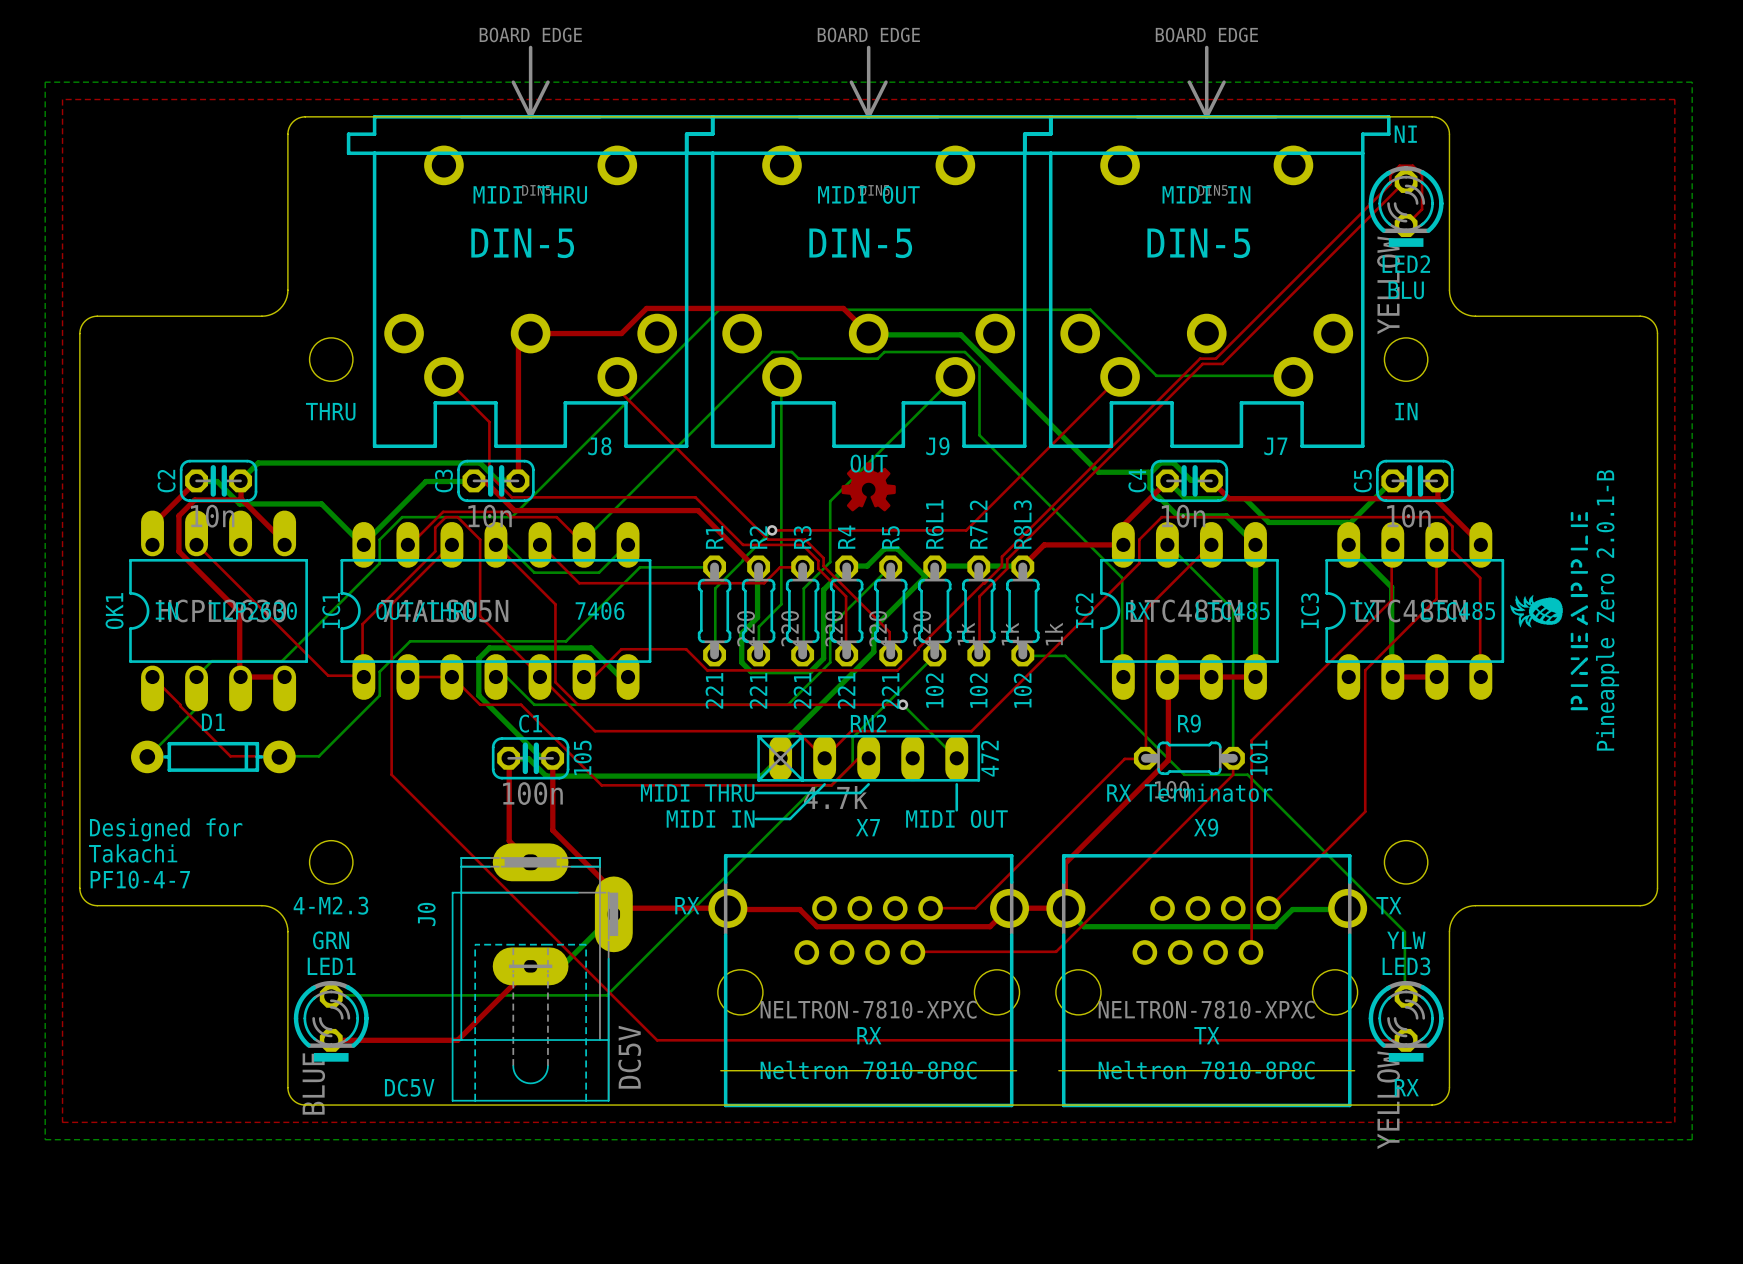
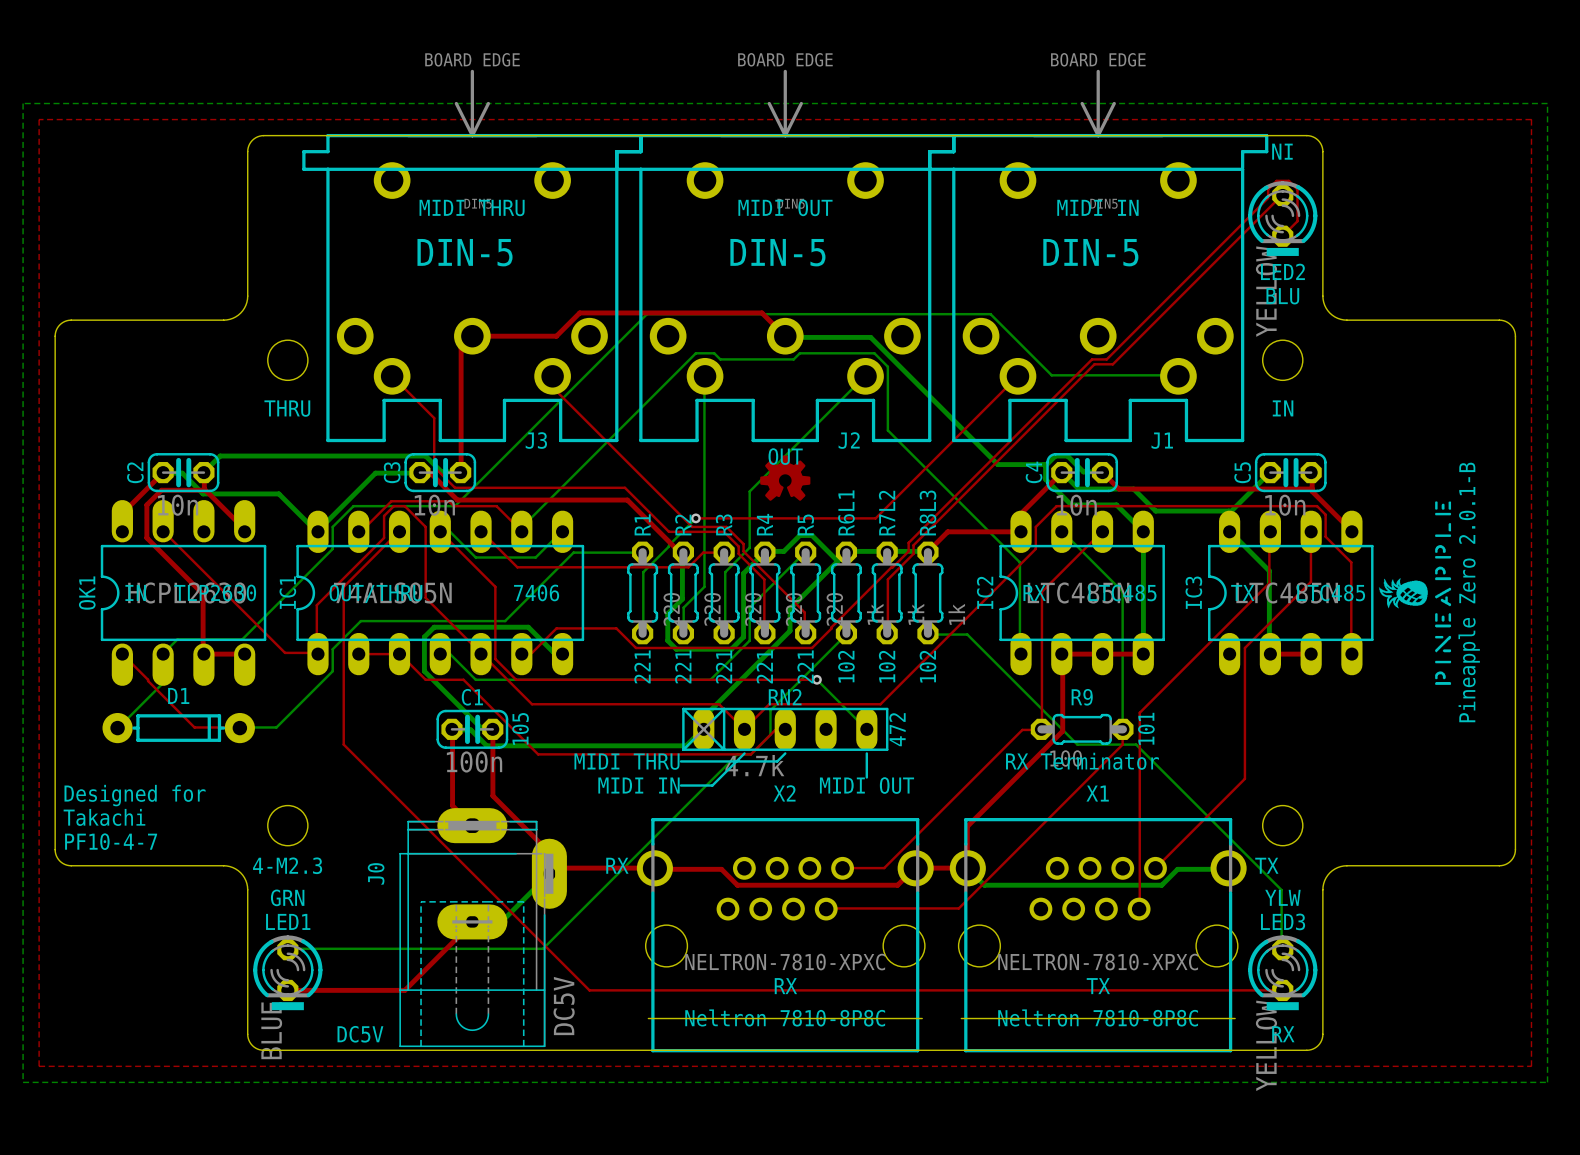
J8 name: J8 (599, 446) -> J3 (536, 440)
J9 name: J9 (937, 446) -> J2 (849, 440)
J7 name: J7 (1275, 446) -> J1 (1162, 440)
X7 name: X7 (867, 827) -> X2 (784, 793)
X9 name: X9 (1206, 827) -> X1 (1097, 793)

